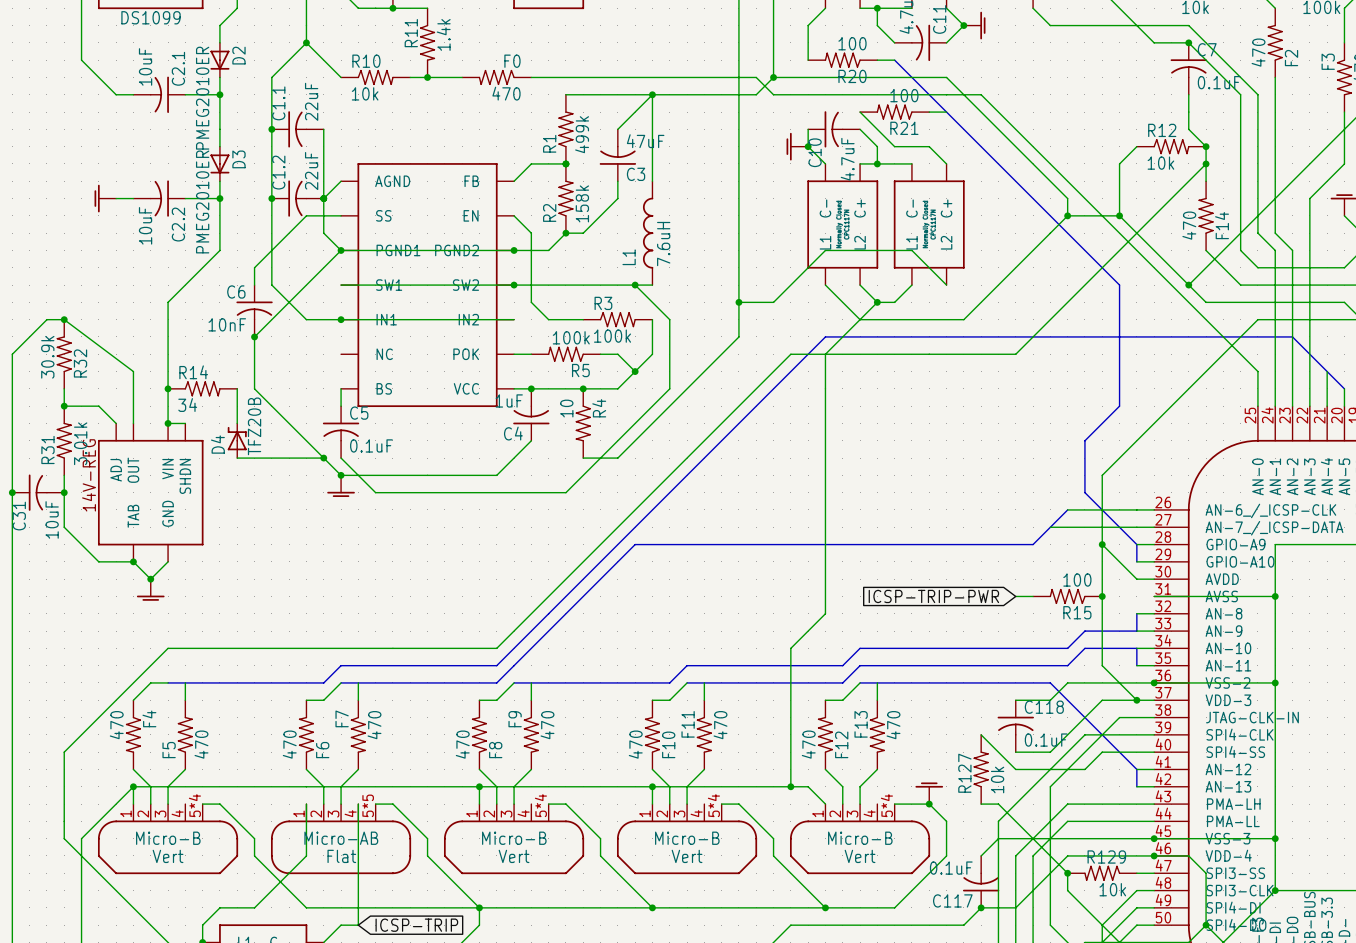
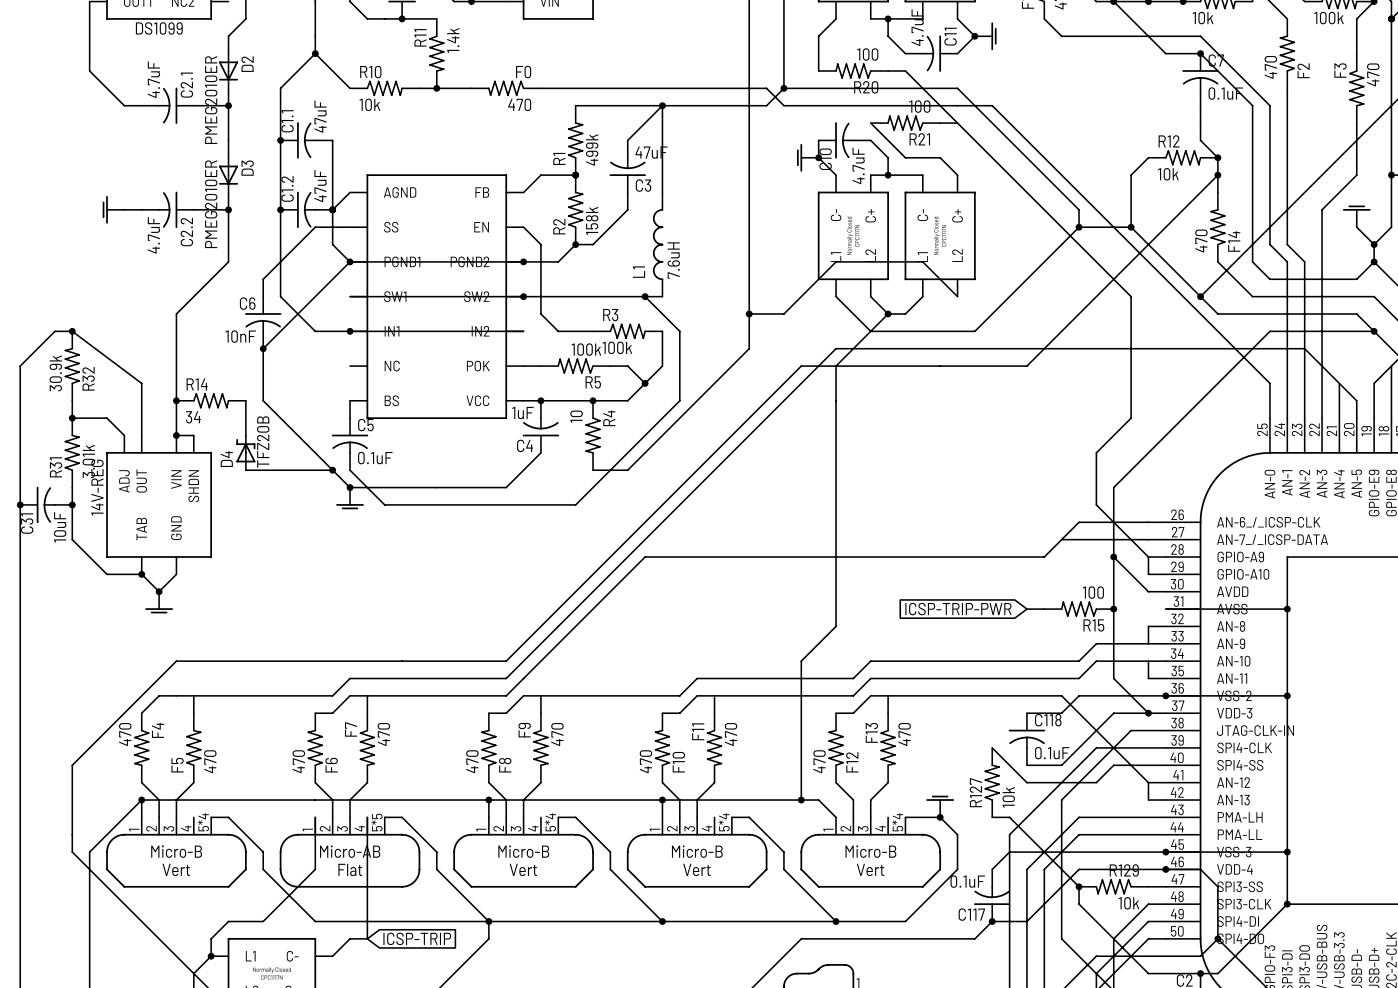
C2.1 value: 10uF (145, 66) -> 4.7uF (153, 79)
C1.1 value: 22uF (311, 101) -> 47uF (320, 116)
C1.2 value: 22uF (311, 171) -> 47uF (320, 186)
C2.2 value: 10uF (145, 225) -> 4.7uF (153, 235)

